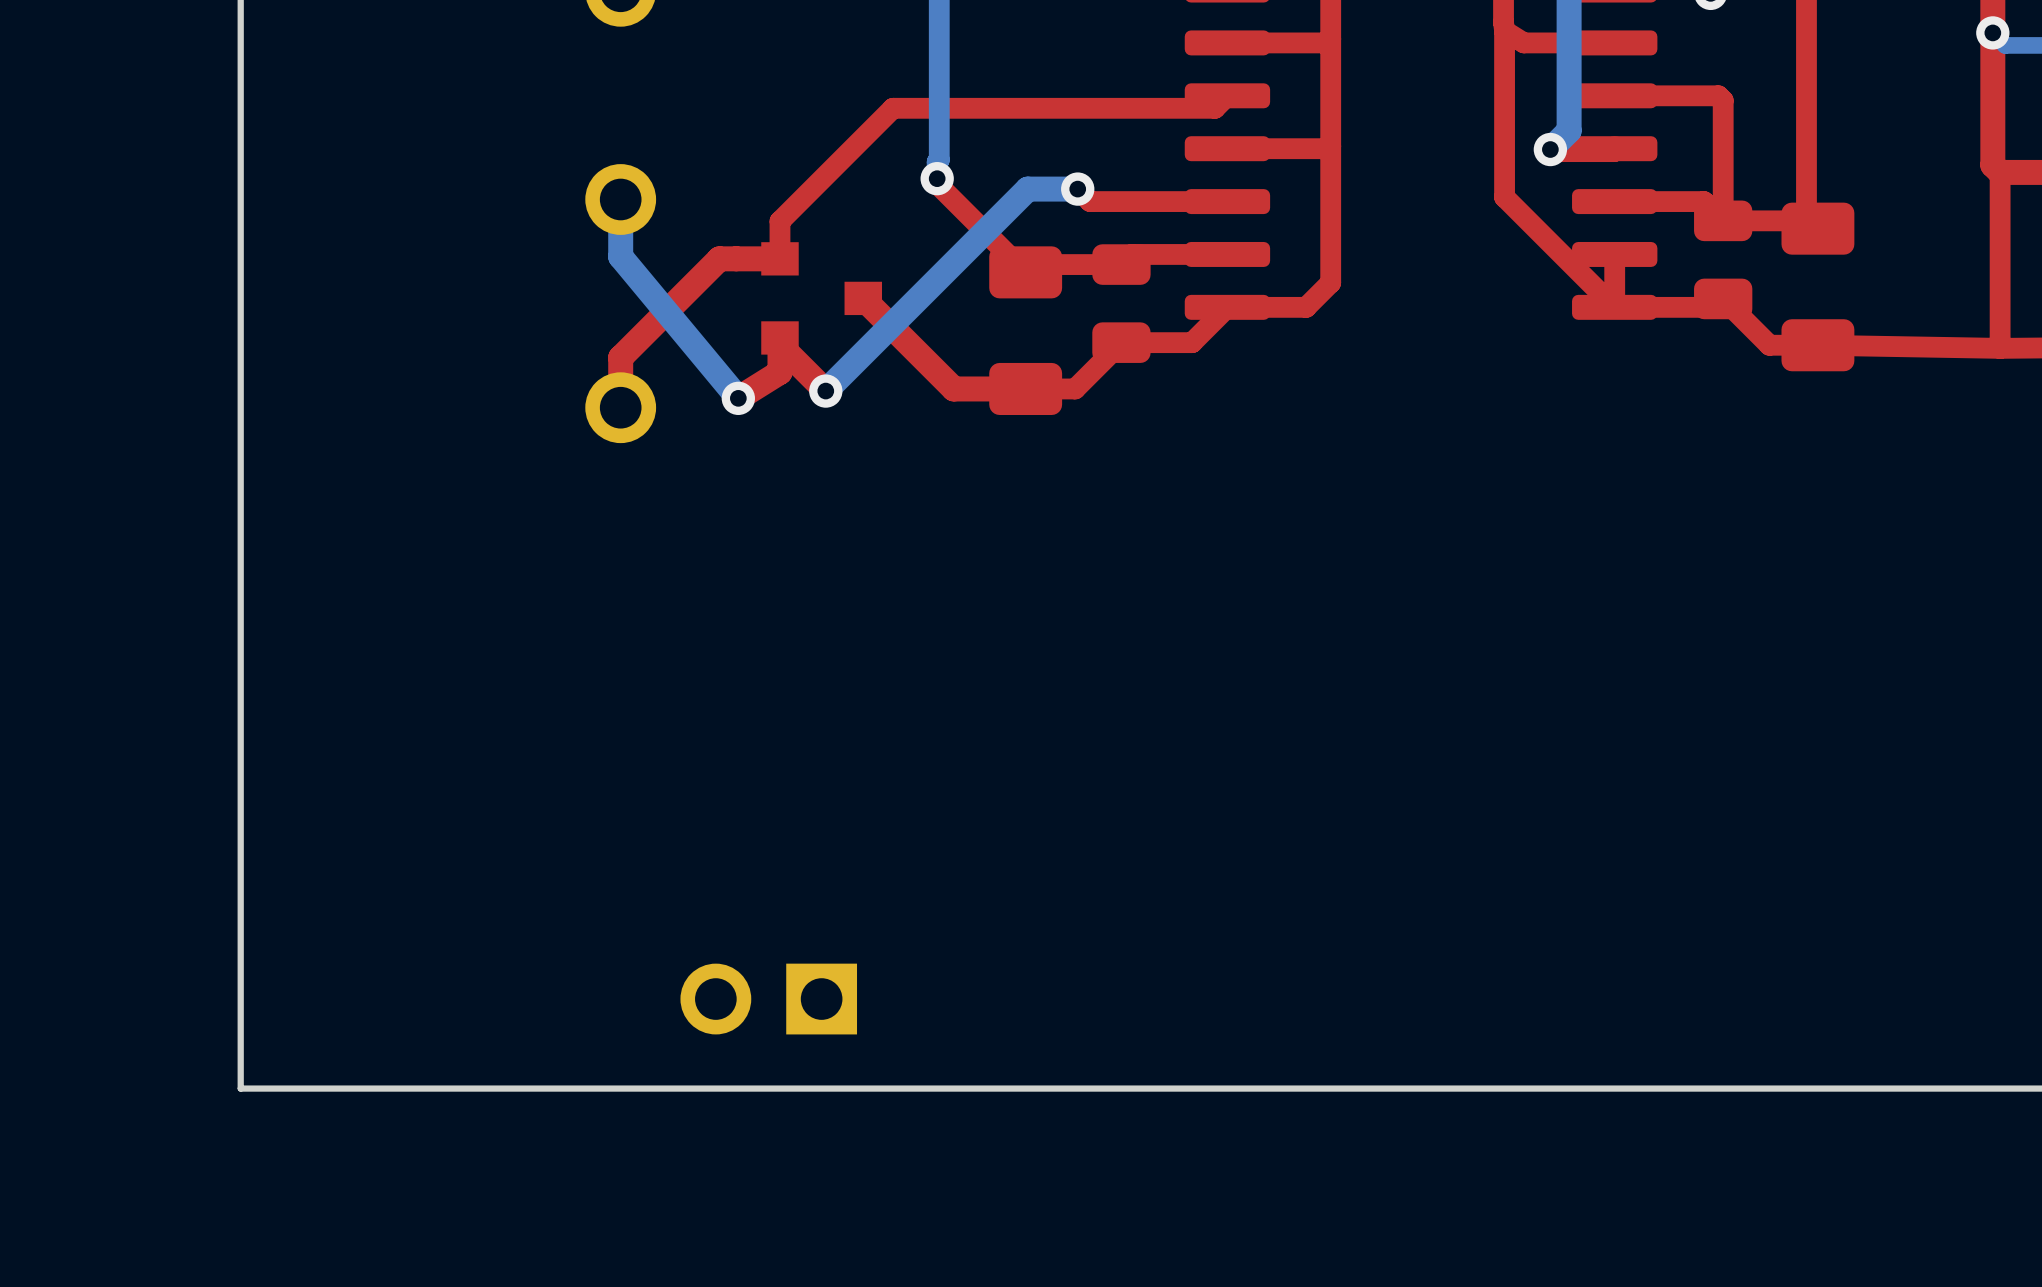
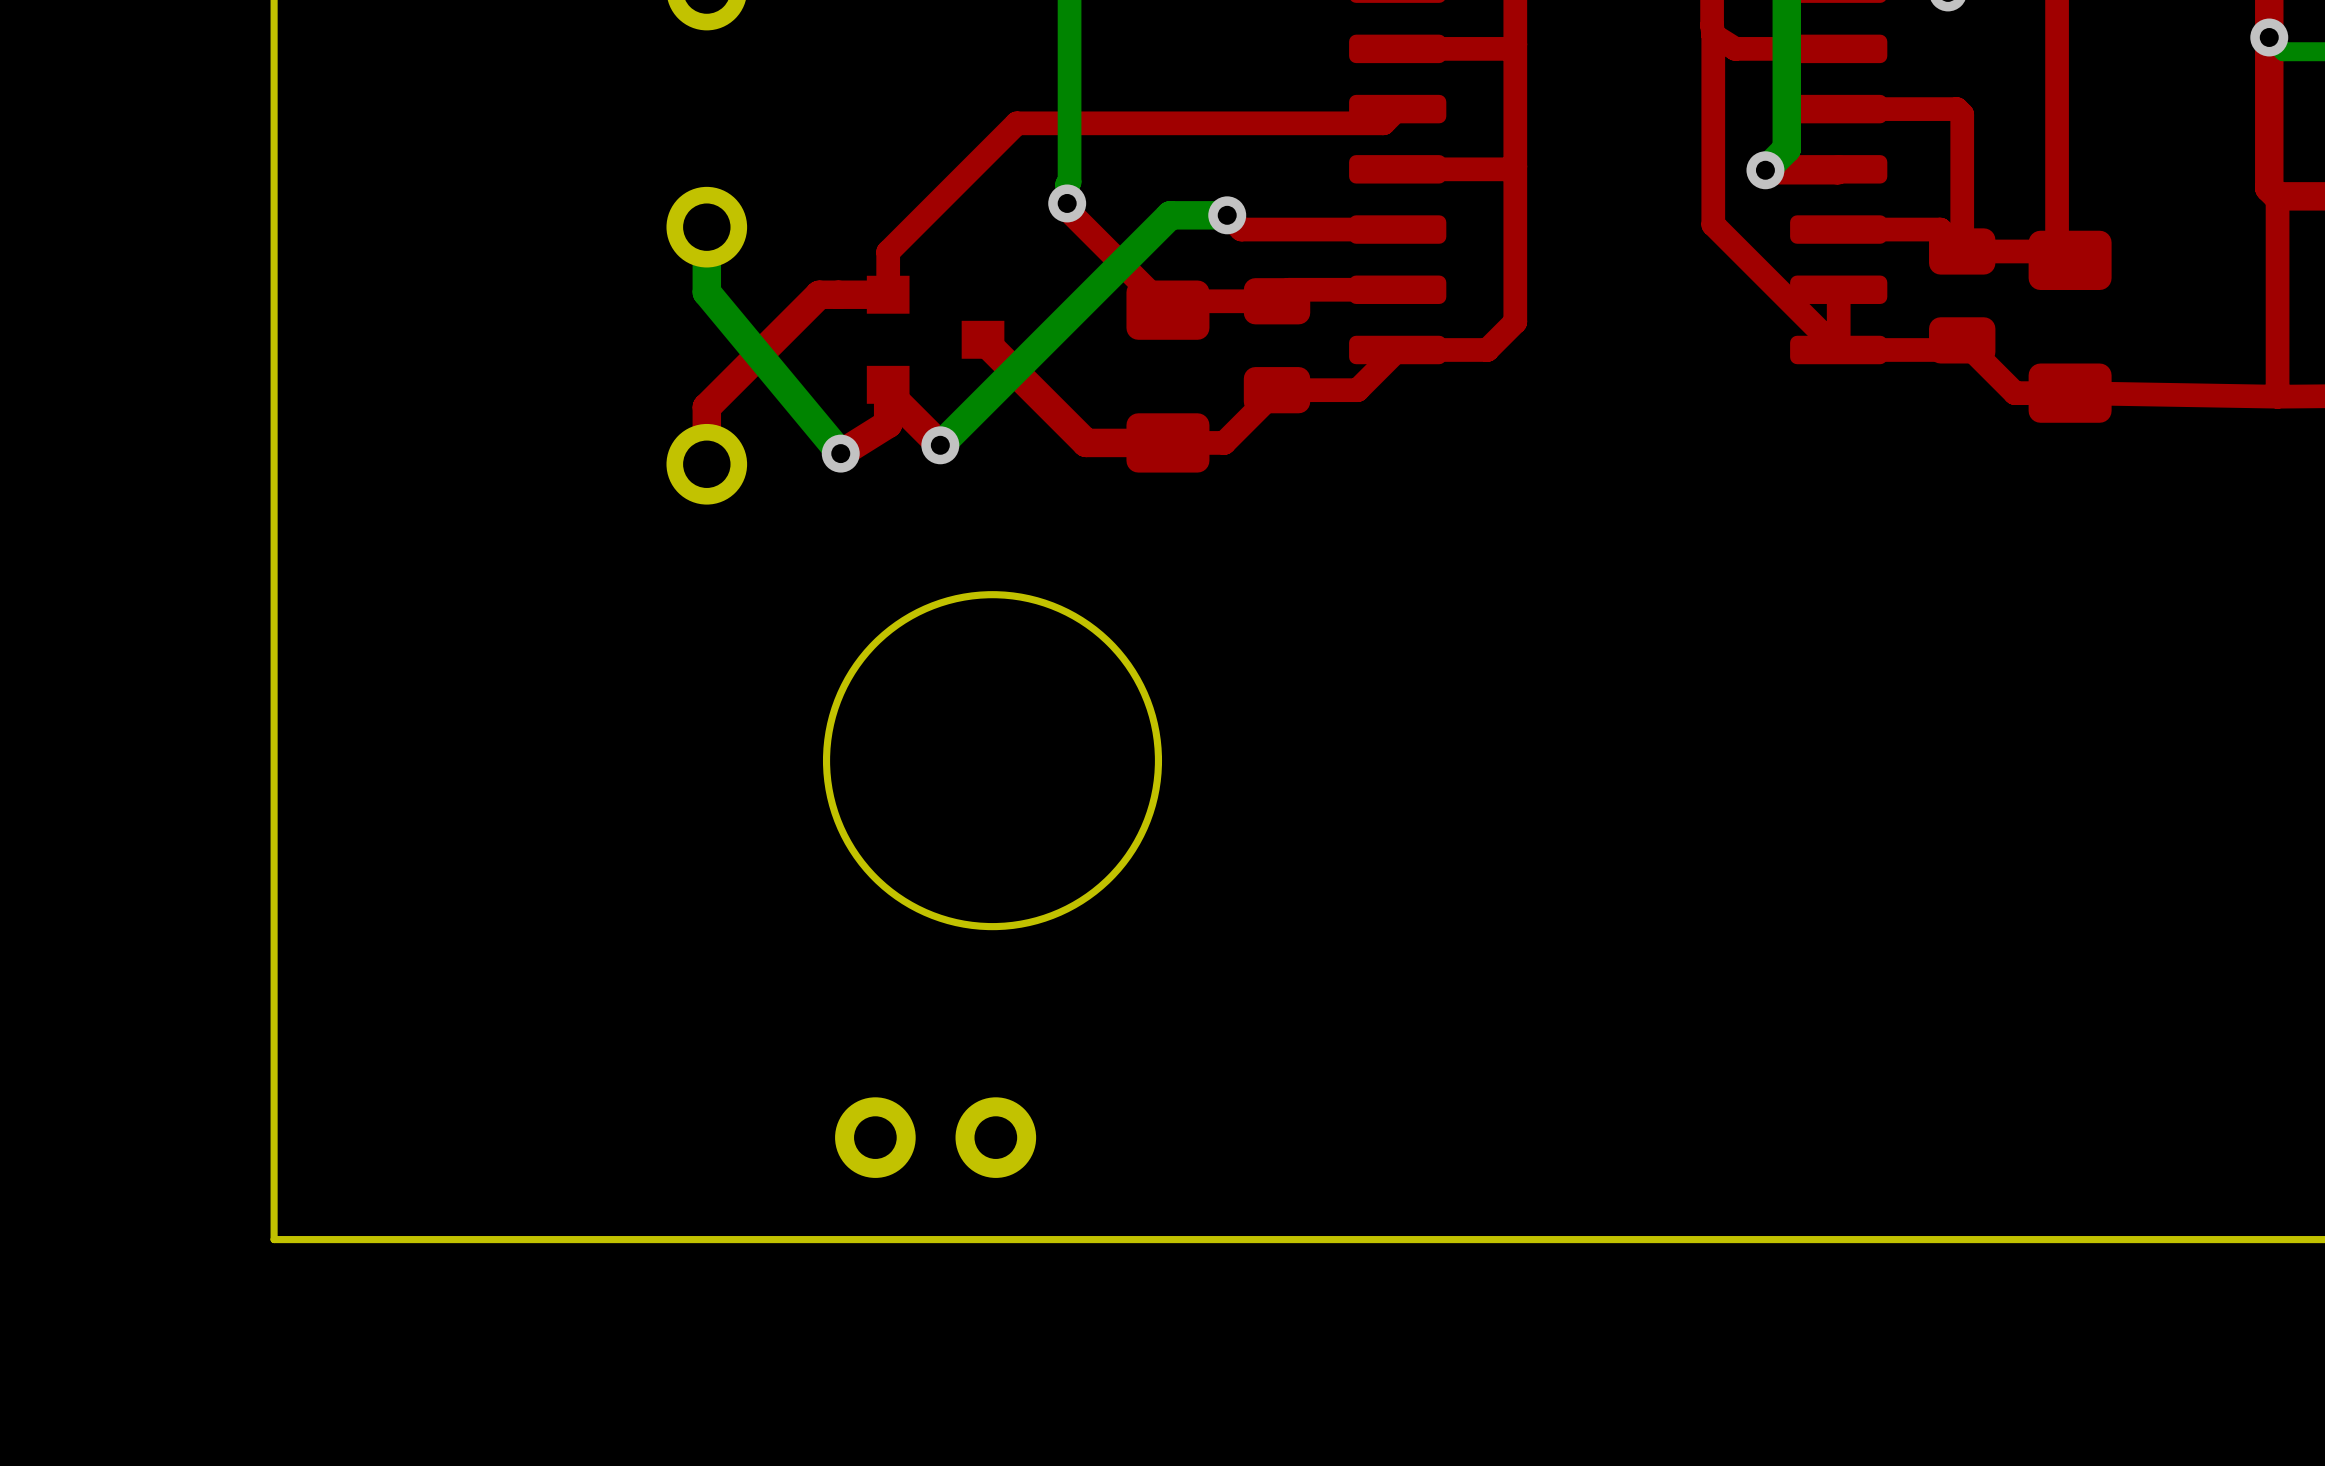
round board edge: none -> [822, 591, 1163, 931]
part: (768, 999) -> none
part: none -> (935, 1137)

